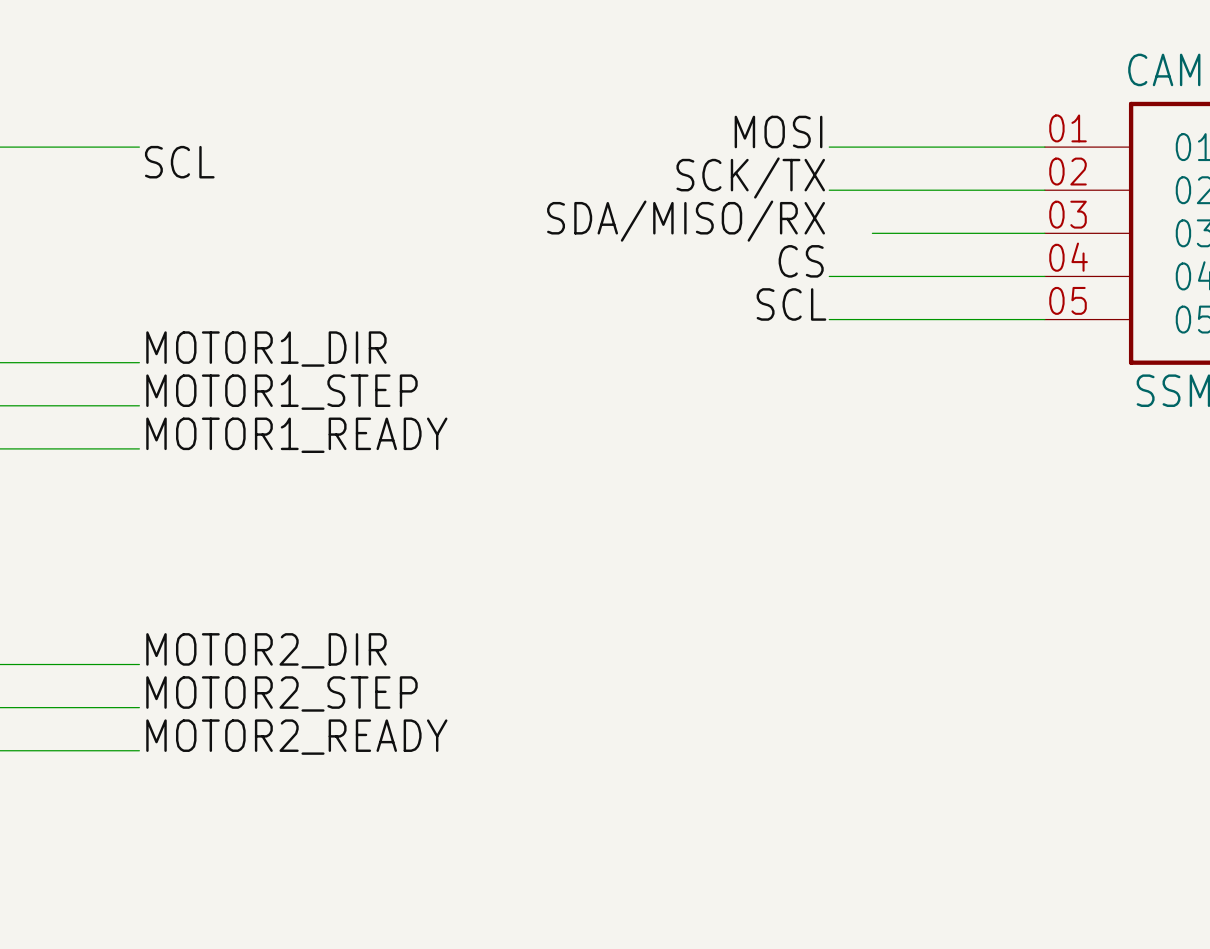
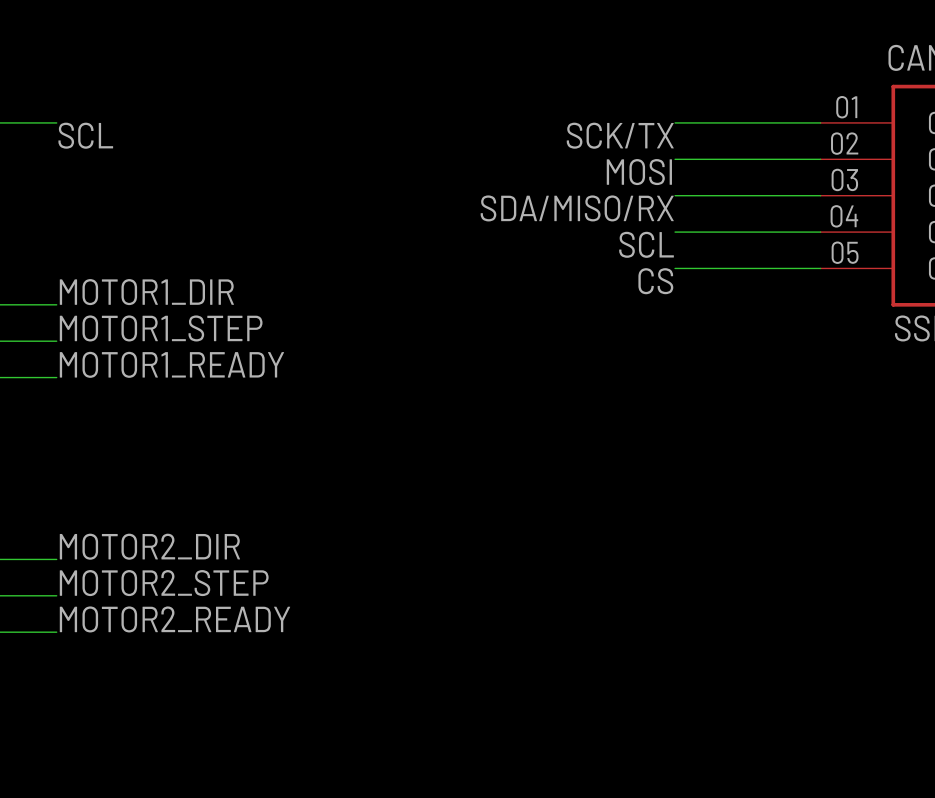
label position: MOSI (778, 132) -> MOSI (639, 172)
wire: (829, 147) (872, 147) -> none
label position: SCK/TX (750, 177) -> SCK/TX (620, 135)
wire: (829, 190) (872, 190) -> none
label position: SDA/MISO/RX (686, 221) -> SDA/MISO/RX (577, 208)
label position: CS (801, 261) -> CS (655, 281)
wire: (829, 276) (872, 276) -> none
label position: SCL (791, 304) -> SCL (646, 244)
wire: (829, 319) (872, 319) -> none

